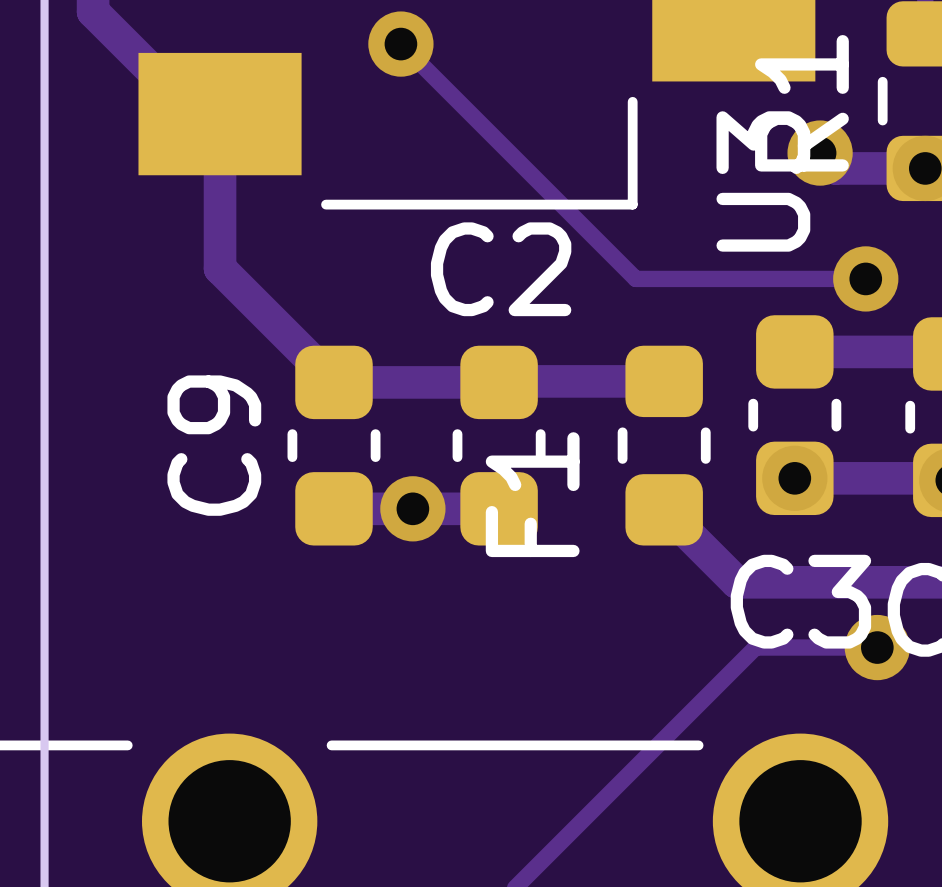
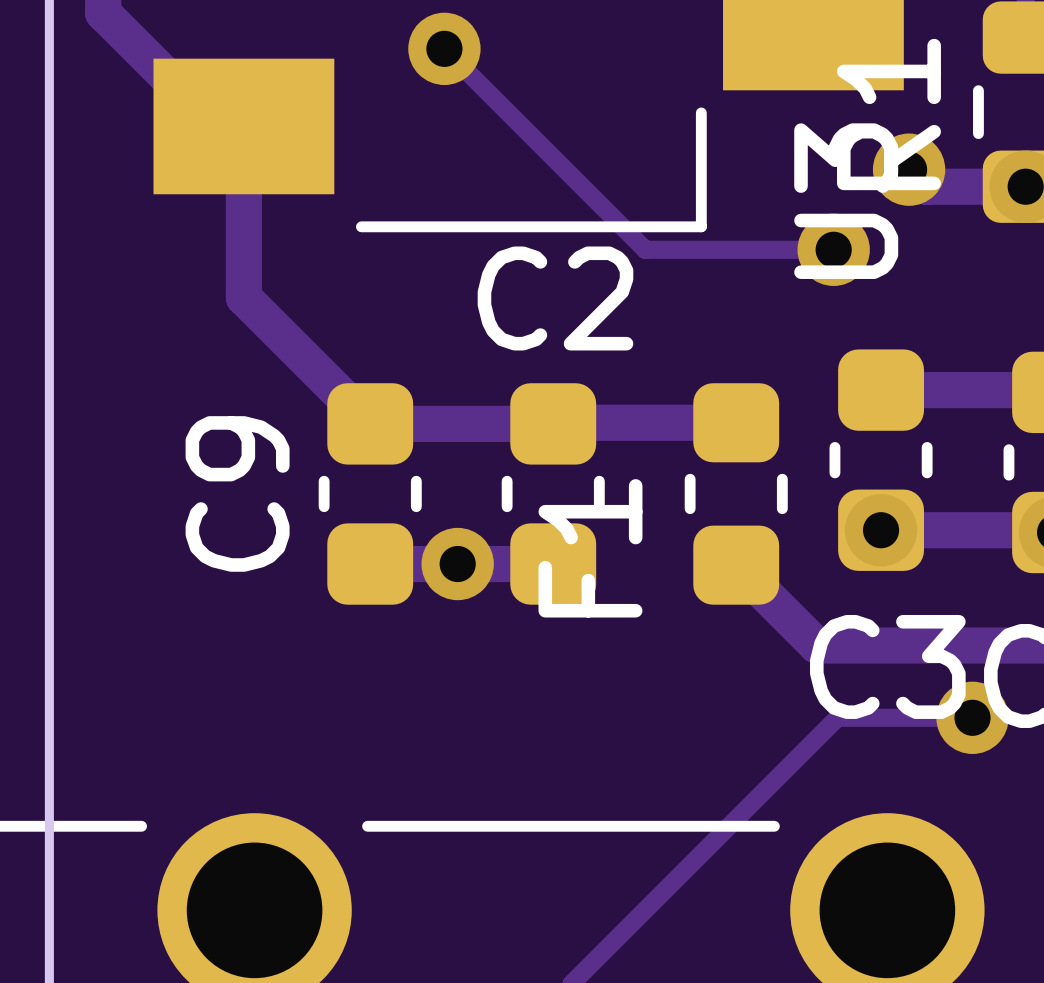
track: (582, 225) (635, 278) (865, 278) -> (645, 249) (833, 249)
via position: (865, 278) -> (833, 249)

